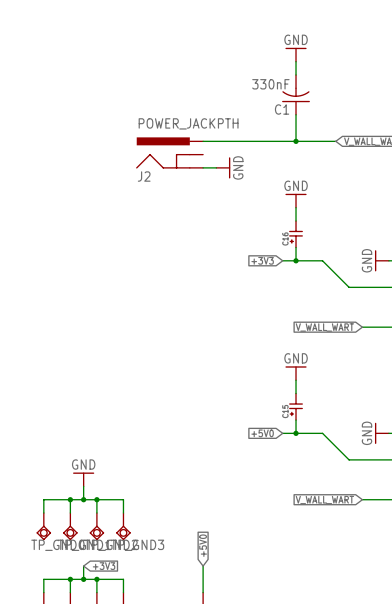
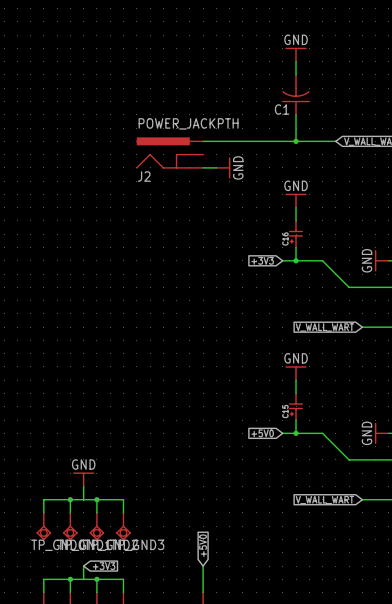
C1 value: 330nF (270, 84) -> none
junction: (83, 499) -> none
junction: (83, 579) -> none

